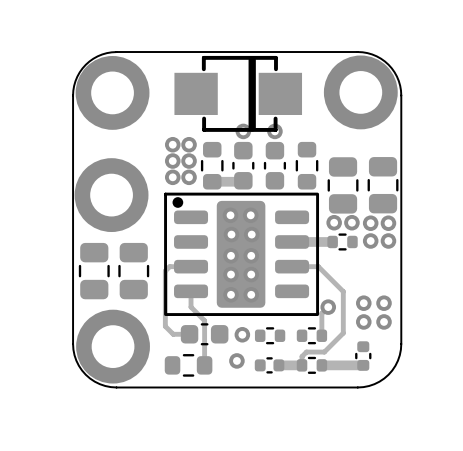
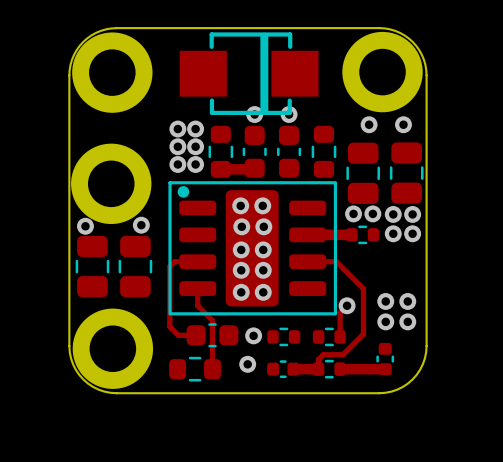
via: none -> (369, 124)
via: none -> (403, 124)
via: none -> (141, 225)
via: none -> (85, 226)

